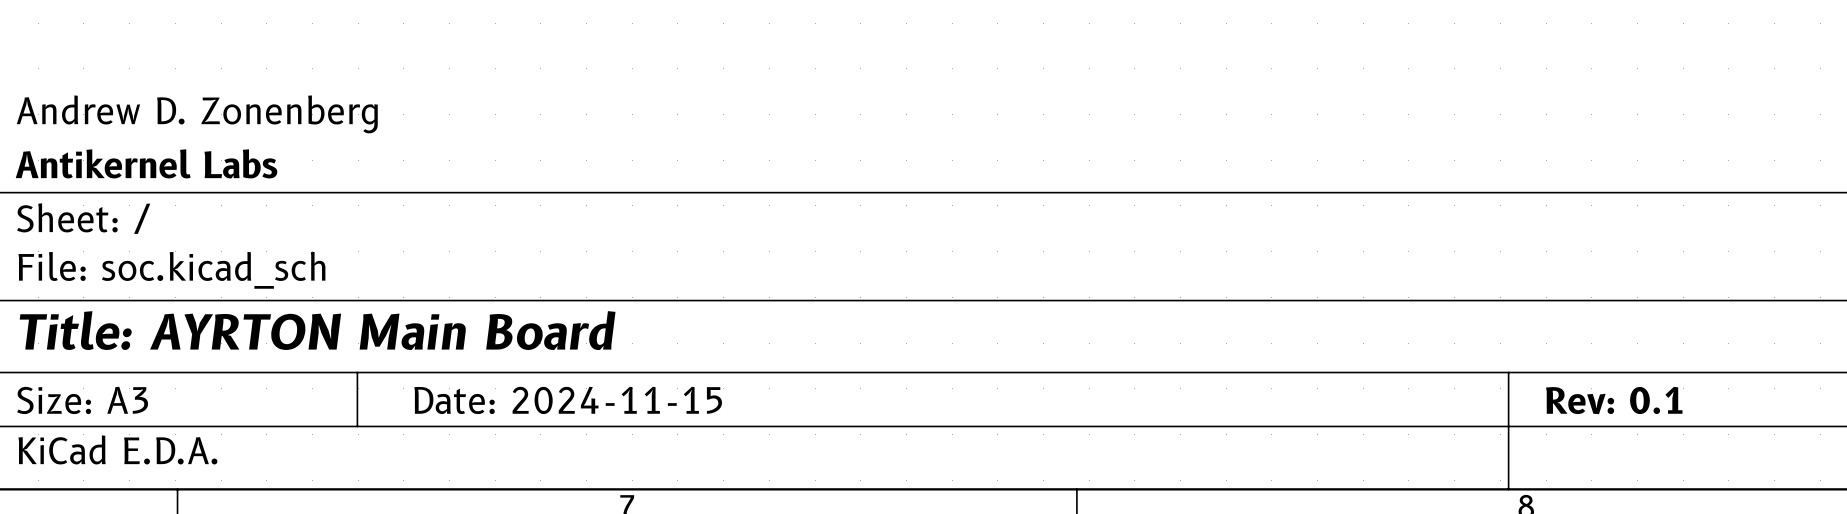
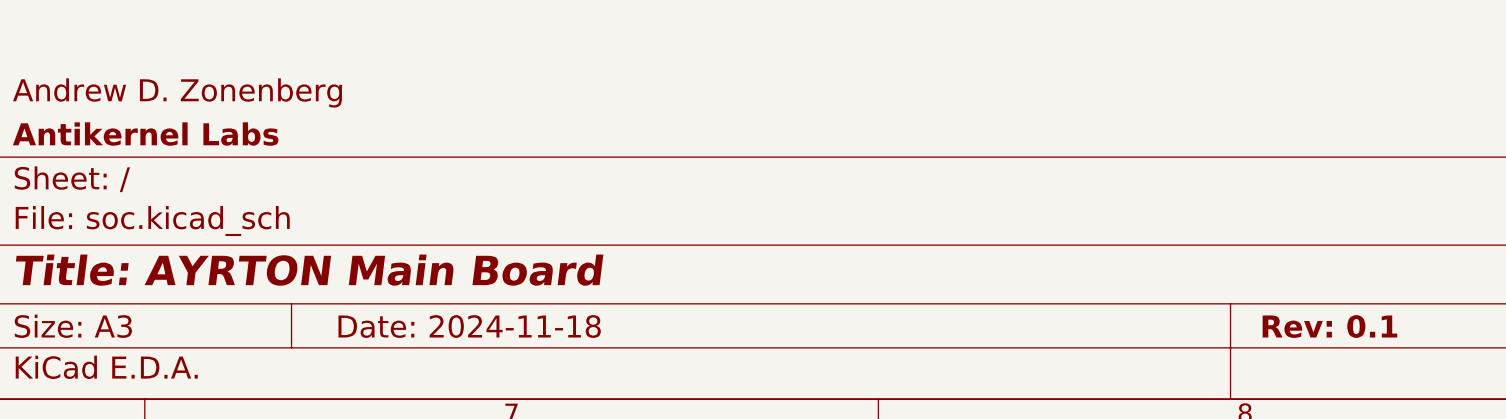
title block: Date: 2024-11-15 (568, 400) -> Date: 2024-11-18 (469, 326)

